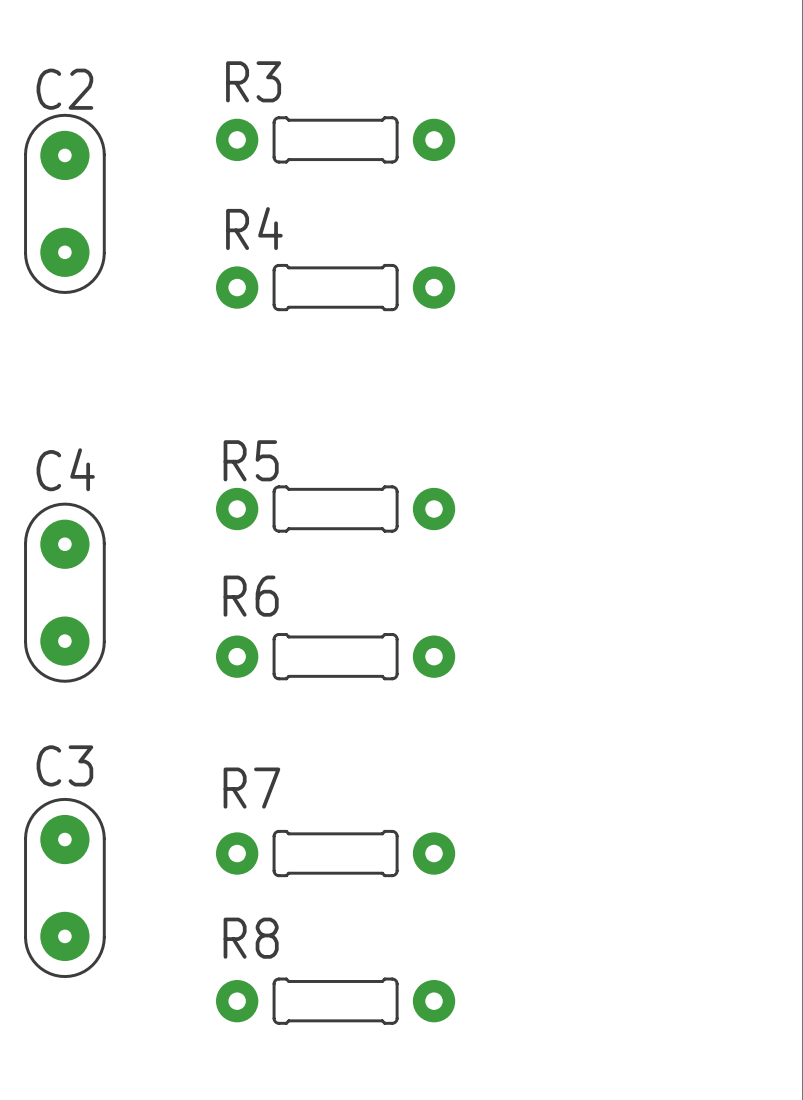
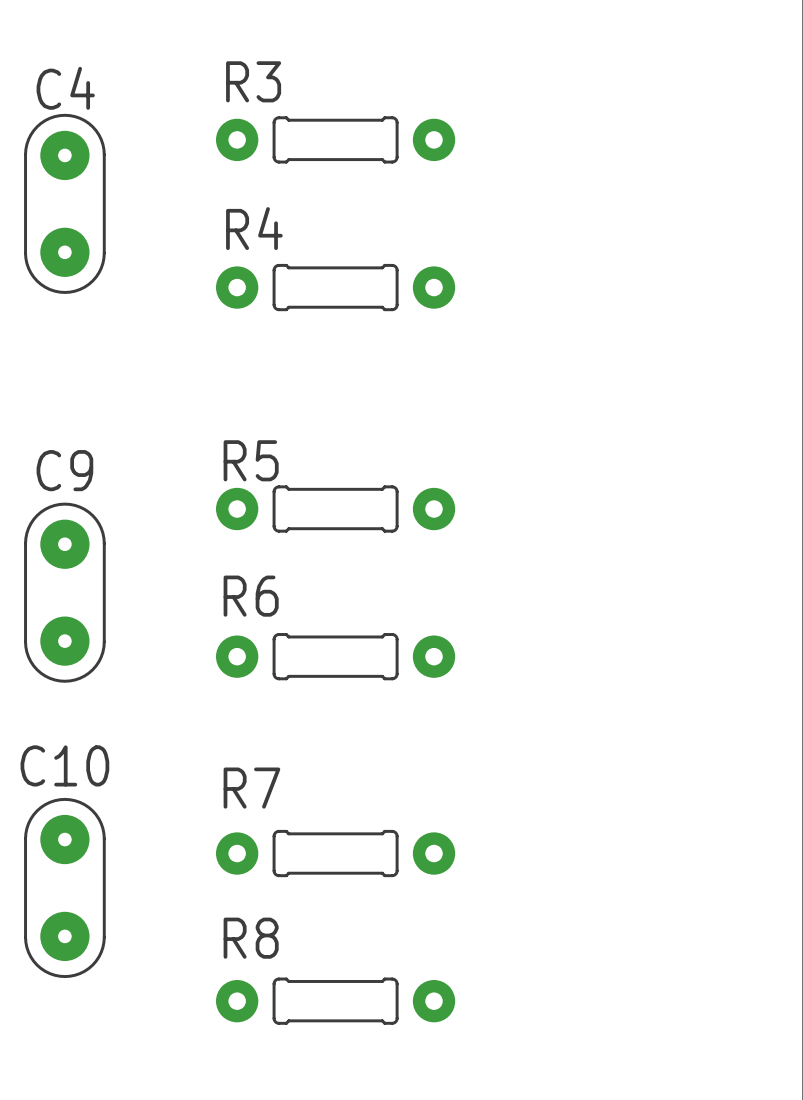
C2 name: C2 (64, 89) -> C4 (65, 88)
C4 name: C4 (65, 469) -> C9 (64, 470)
C3 name: C3 (64, 765) -> C10 (64, 765)

